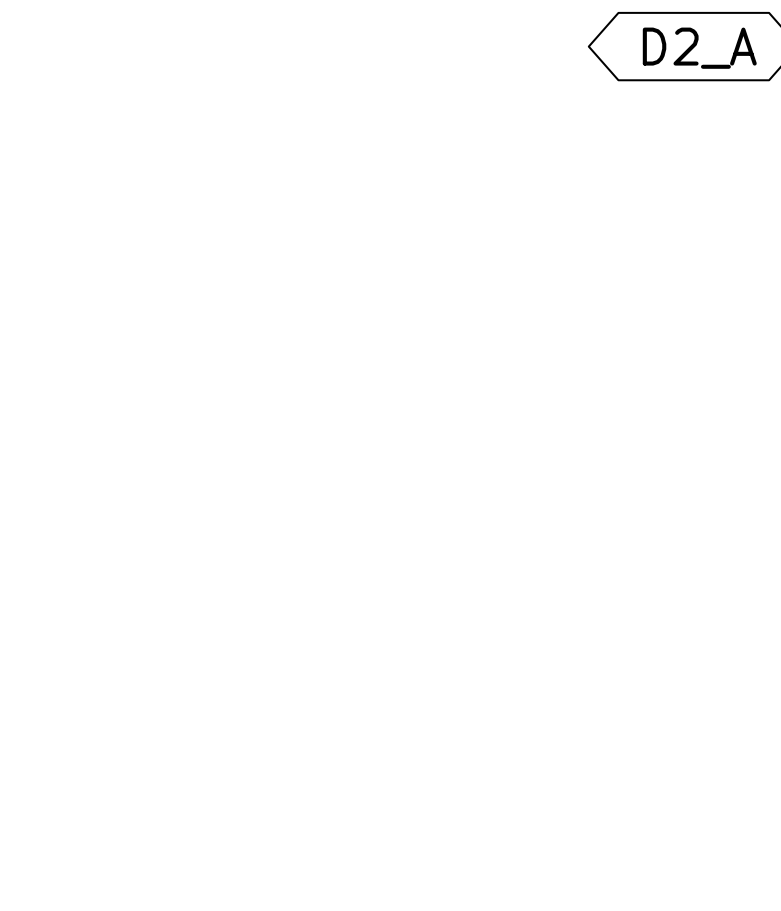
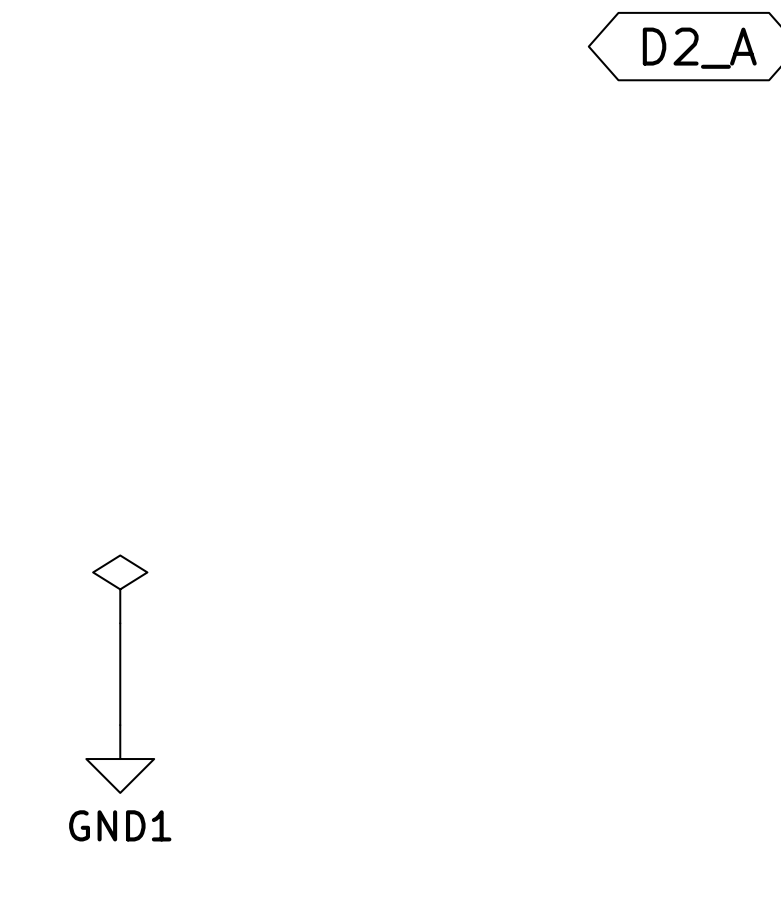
power symbol: none -> (120, 589)
wire: none -> (120, 623) (120, 725)
power symbol: none -> GND1 (120, 759)

